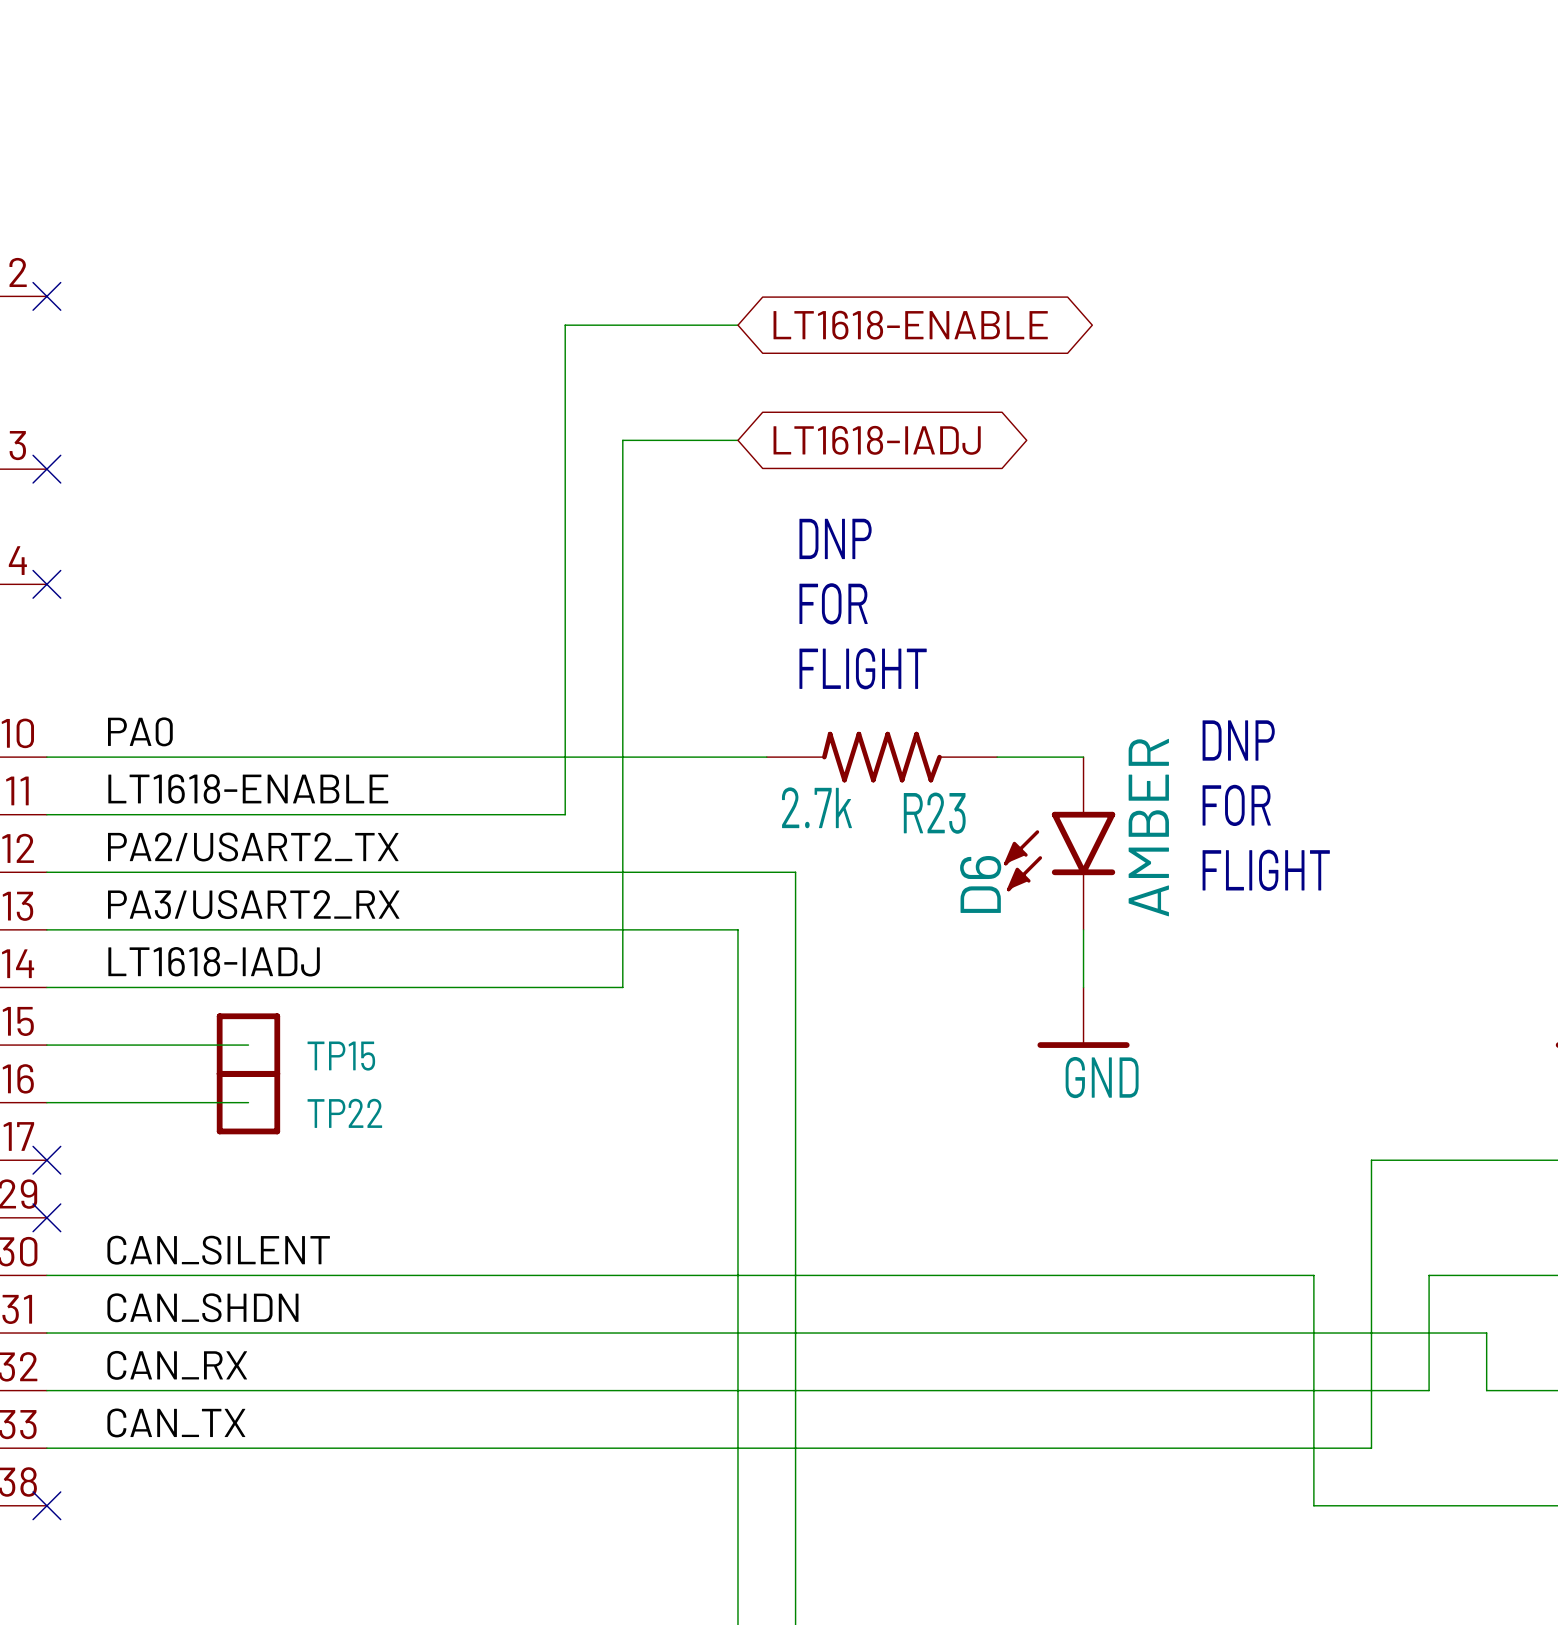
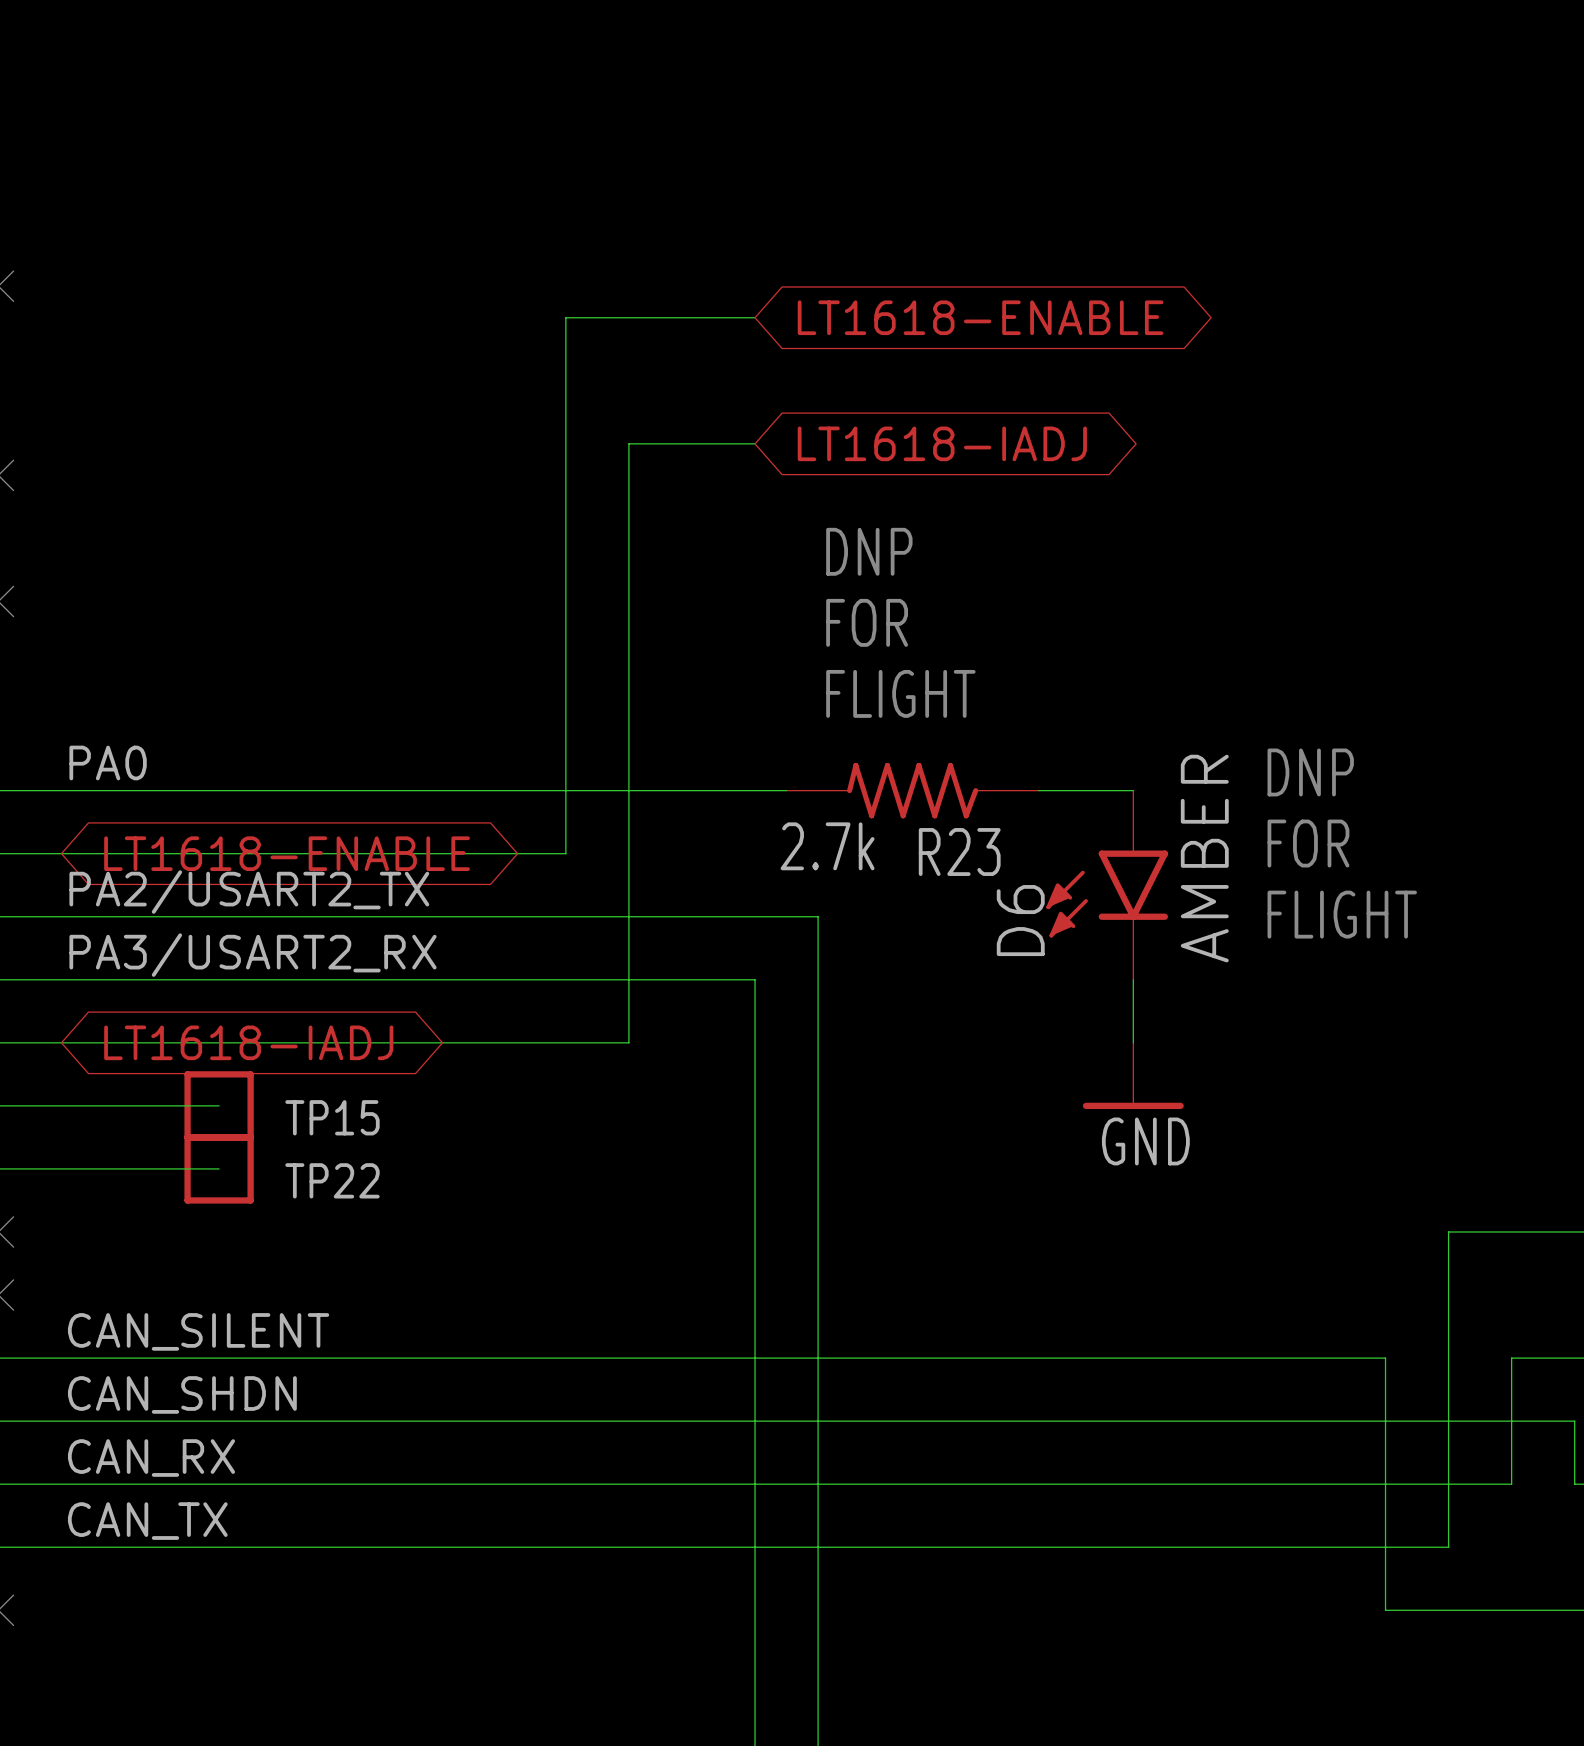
label: LT1618-ENABLE (248, 788) -> none
global label: none -> LT1618-ENABLE (287, 853)
label: LT1618-IADJ (214, 961) -> none
global label: none -> LT1618-IADJ (248, 1042)

